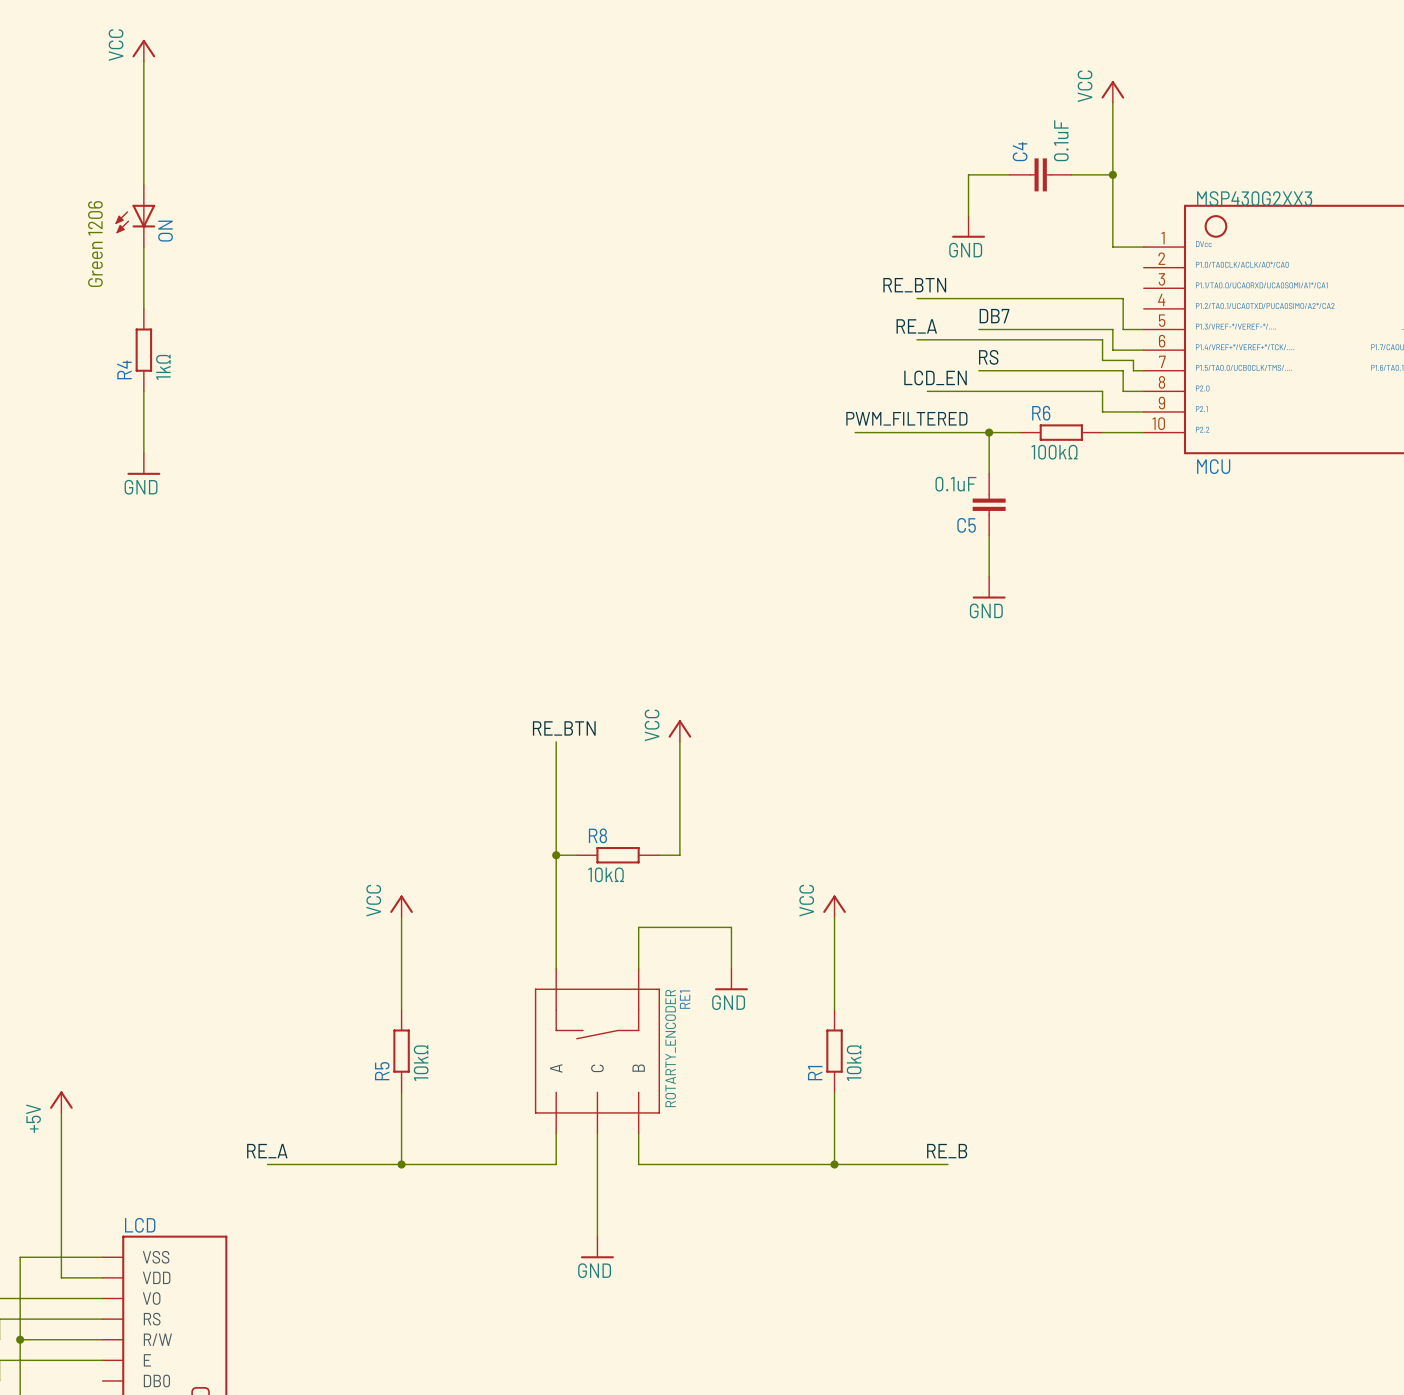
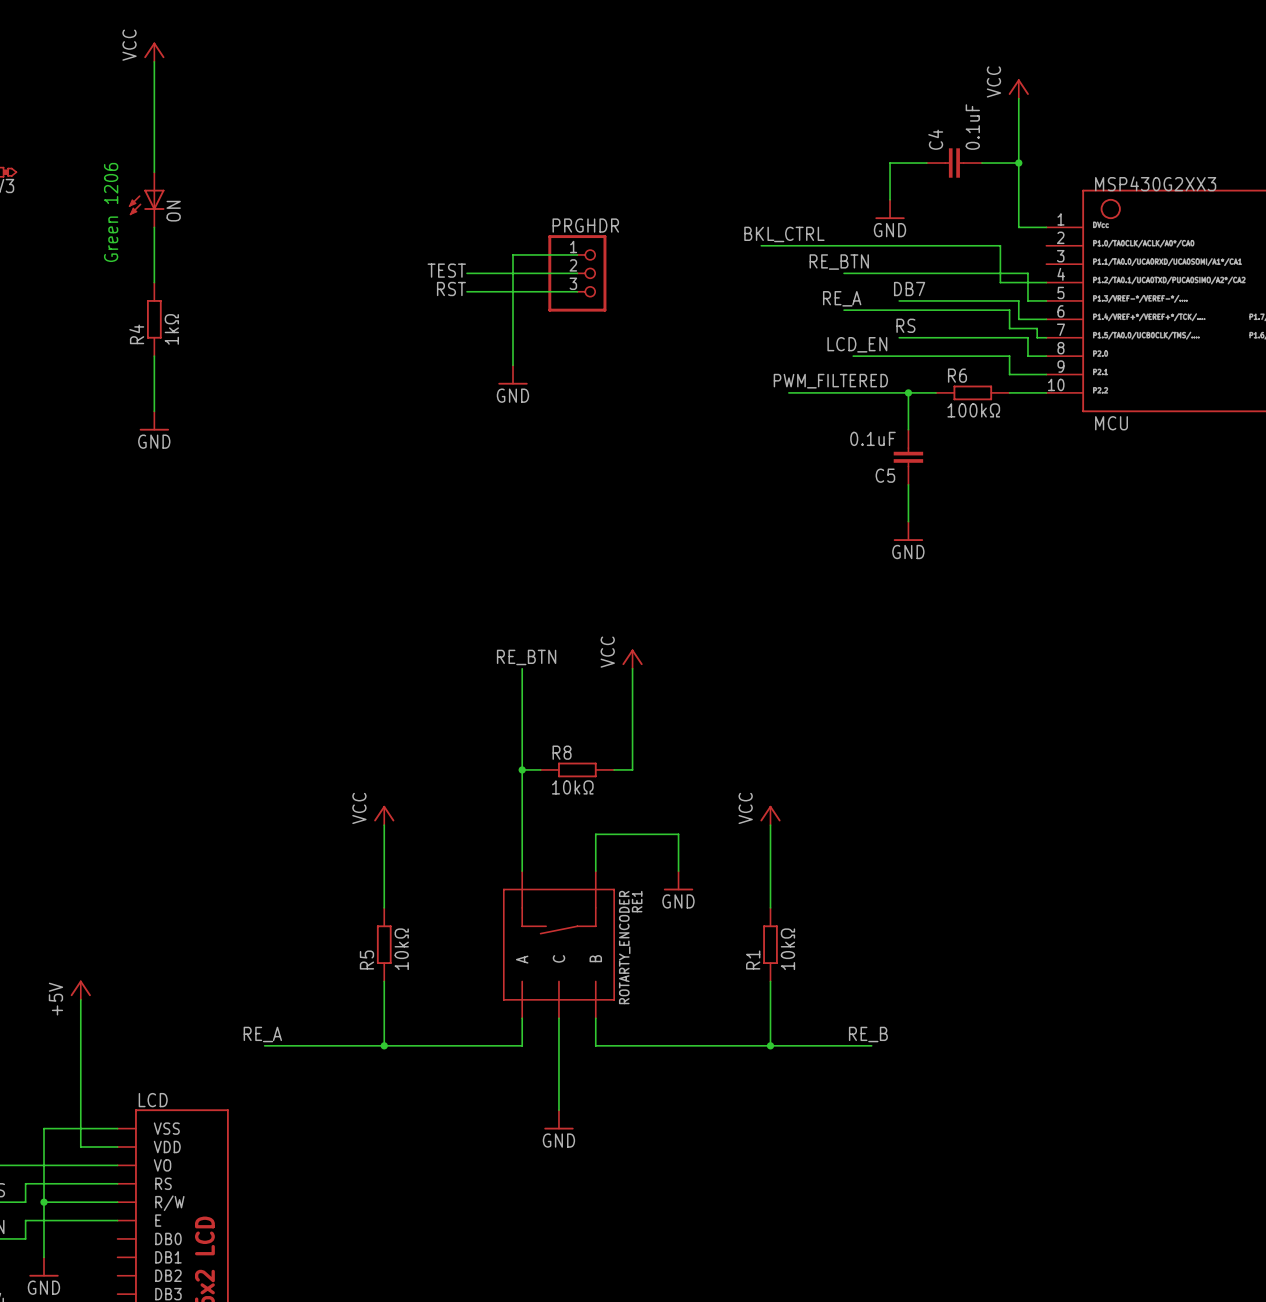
label: none -> BKL_CTRL (784, 234)
wire: none -> (761, 245) (1000, 245) (1000, 282) (1046, 282)
wire: none -> (577, 254) (513, 254) (513, 365)
label: none -> TEST (446, 270)
wire: none -> (467, 273) (577, 273)
PRGHDR: none -> (577, 273)
label: none -> RST (451, 289)
wire: none -> (467, 291) (577, 291)
power symbol: none -> GND (513, 374)

